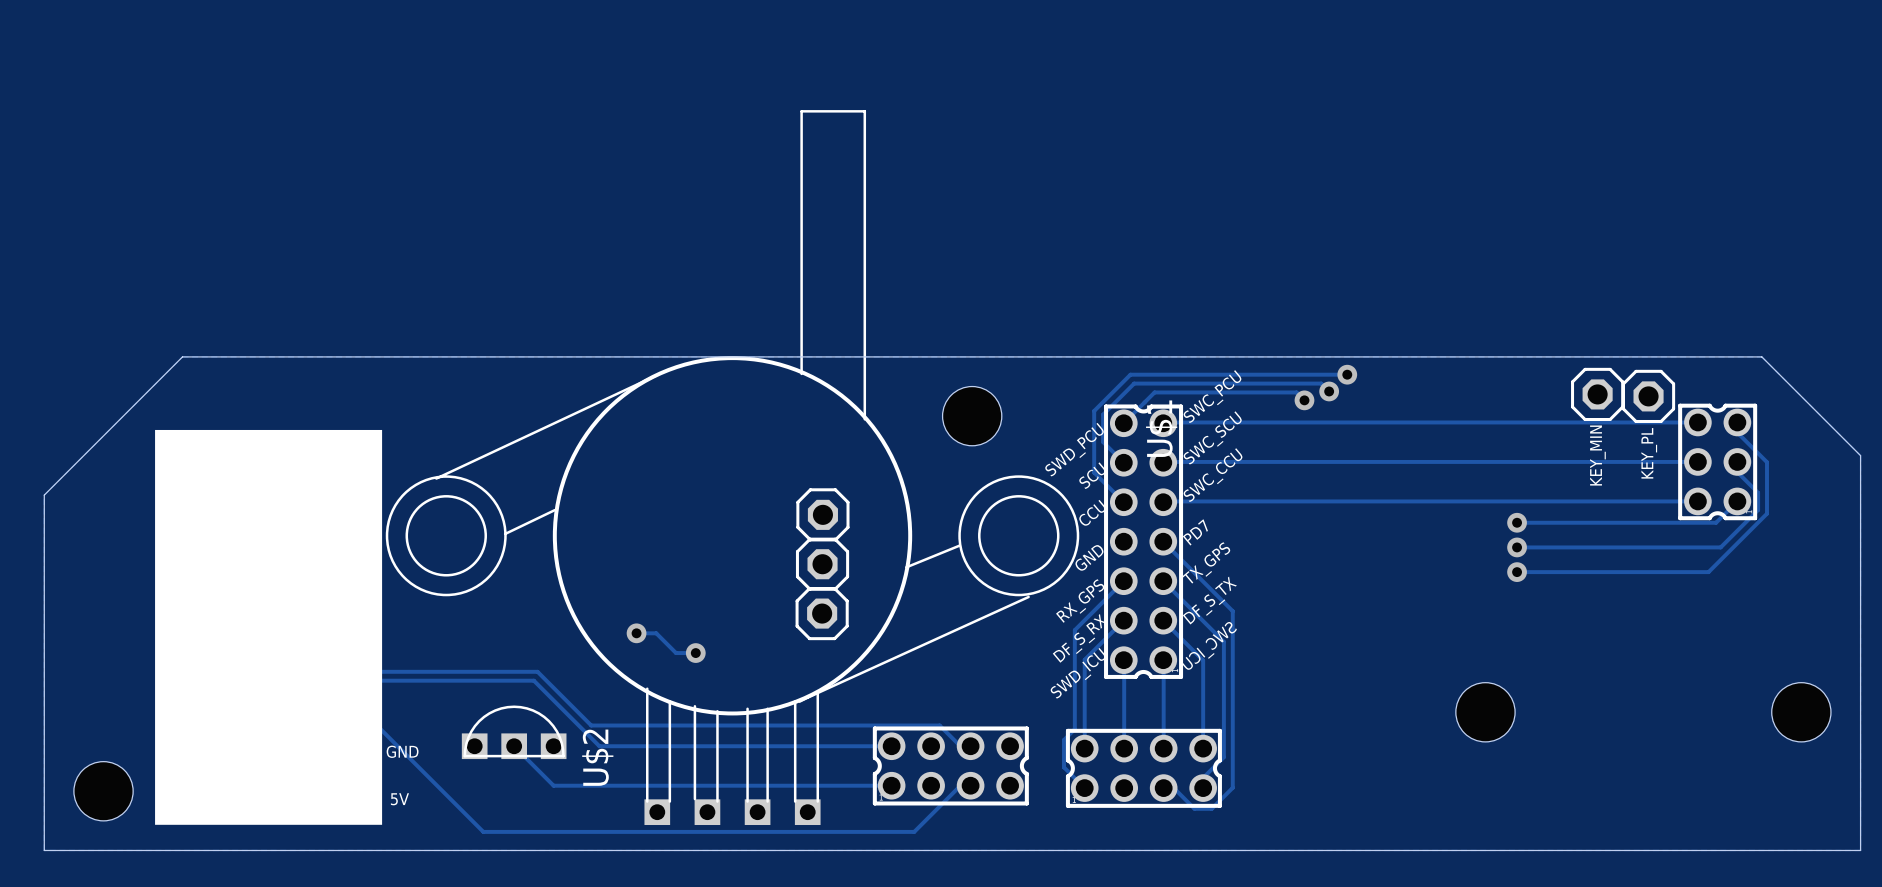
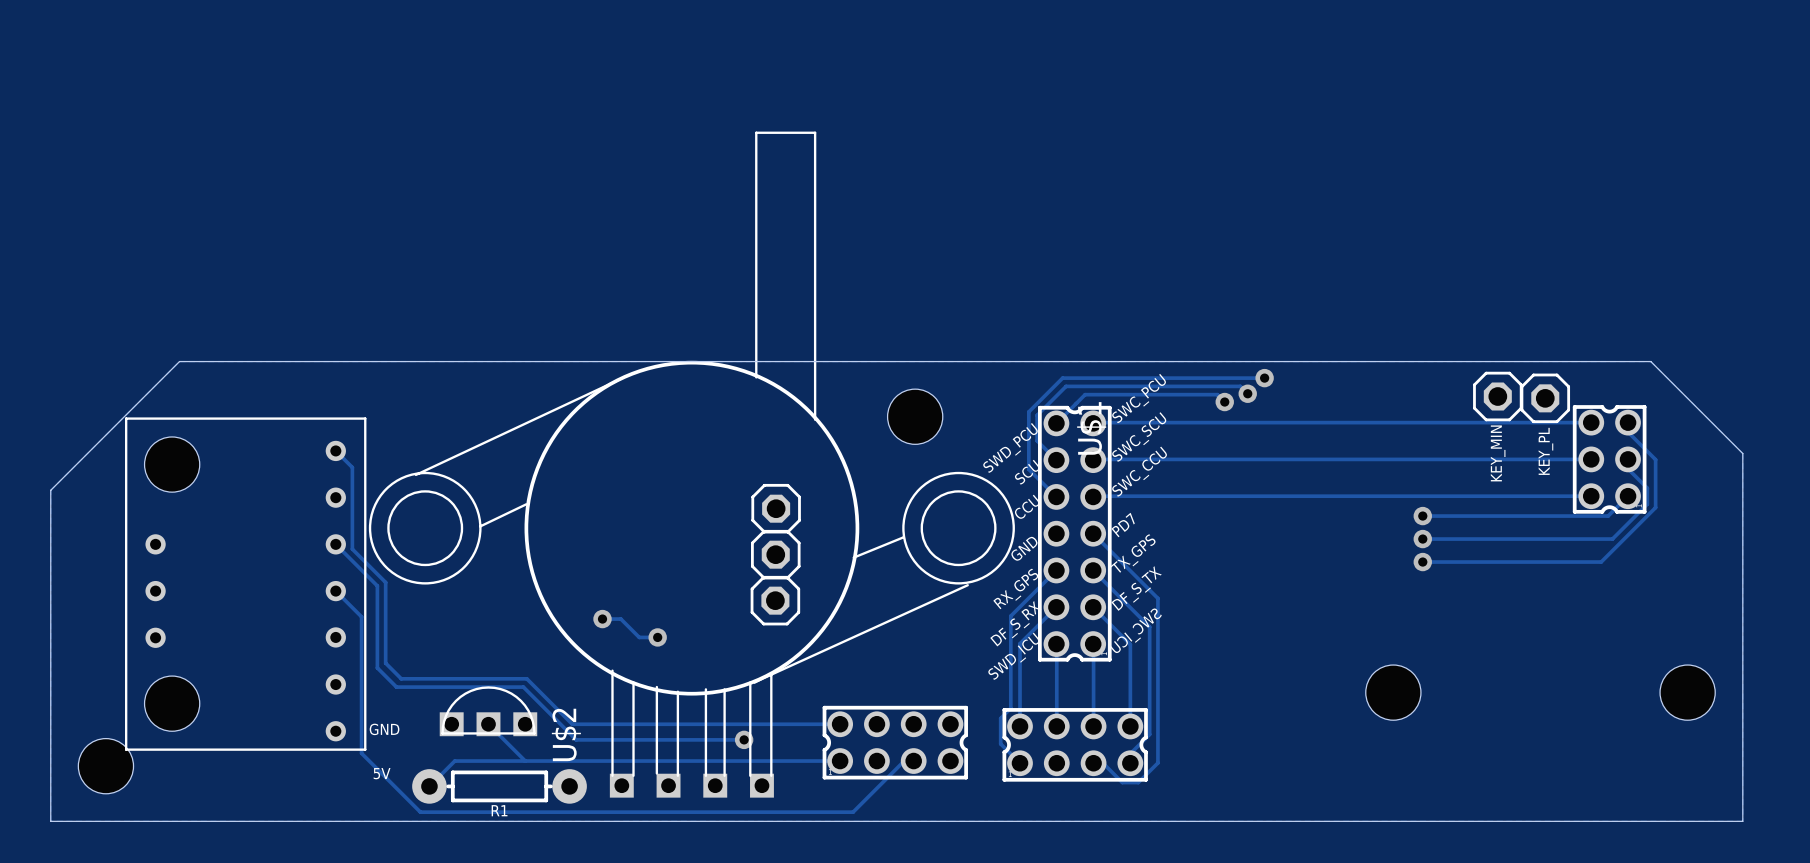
track: (354, 552) (324, 581) (324, 660) (344, 680) (533, 680) (599, 746) (604, 746) -> (335, 450) (352, 467) (352, 549) (385, 582) (385, 663) (401, 678) (526, 678) (572, 724)
track: none -> (335, 544) (377, 585) (377, 667) (396, 687) (523, 687) (576, 739) (744, 739)
part: none -> (245, 584)
part: (268, 627) -> none
track: (354, 652) (373, 671) (537, 671) (591, 725) (939, 725) (960, 746) (970, 746) -> none
track: (354, 702) (483, 831) (914, 831) -> (335, 591) (361, 616) (361, 753) (420, 812) (853, 812) (861, 804)
via: none -> (744, 739)
track: none -> (525, 761) (454, 761) (429, 786)
R1: none -> (499, 786)

